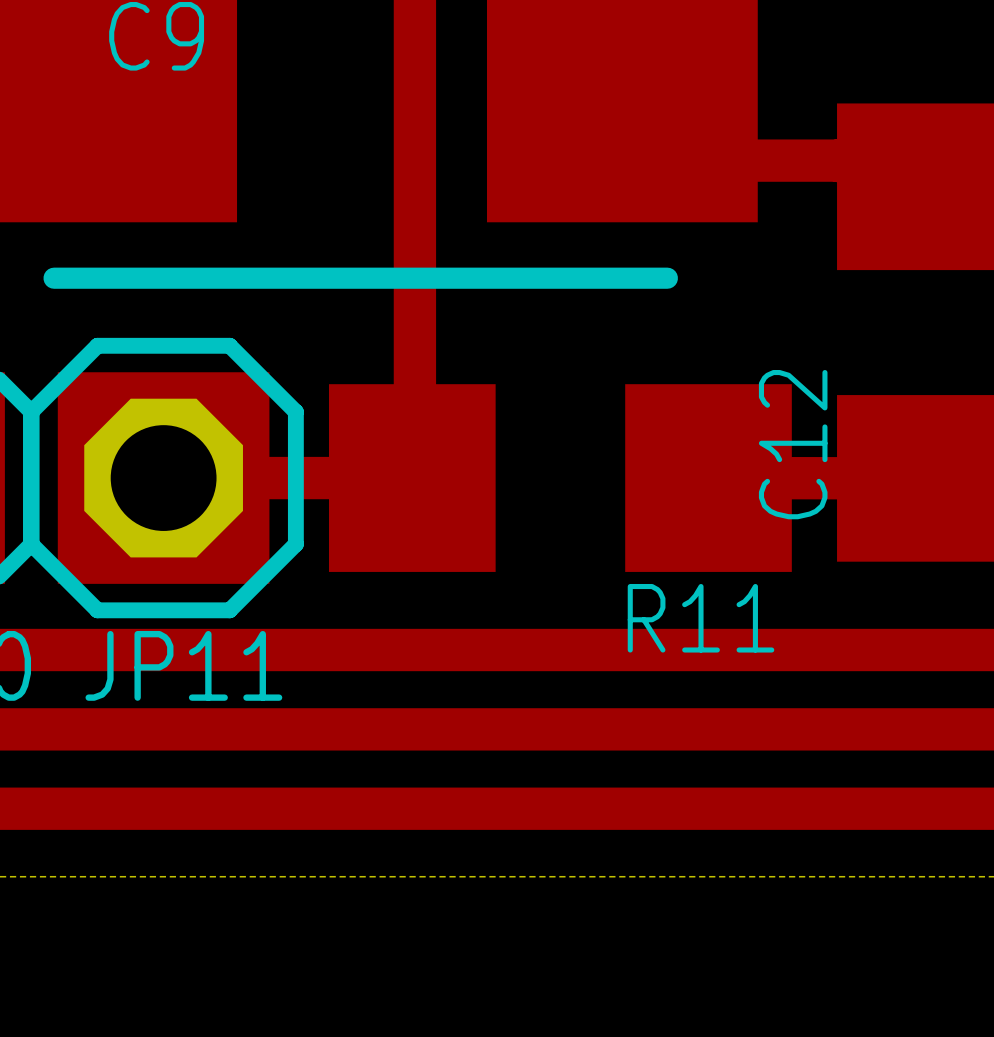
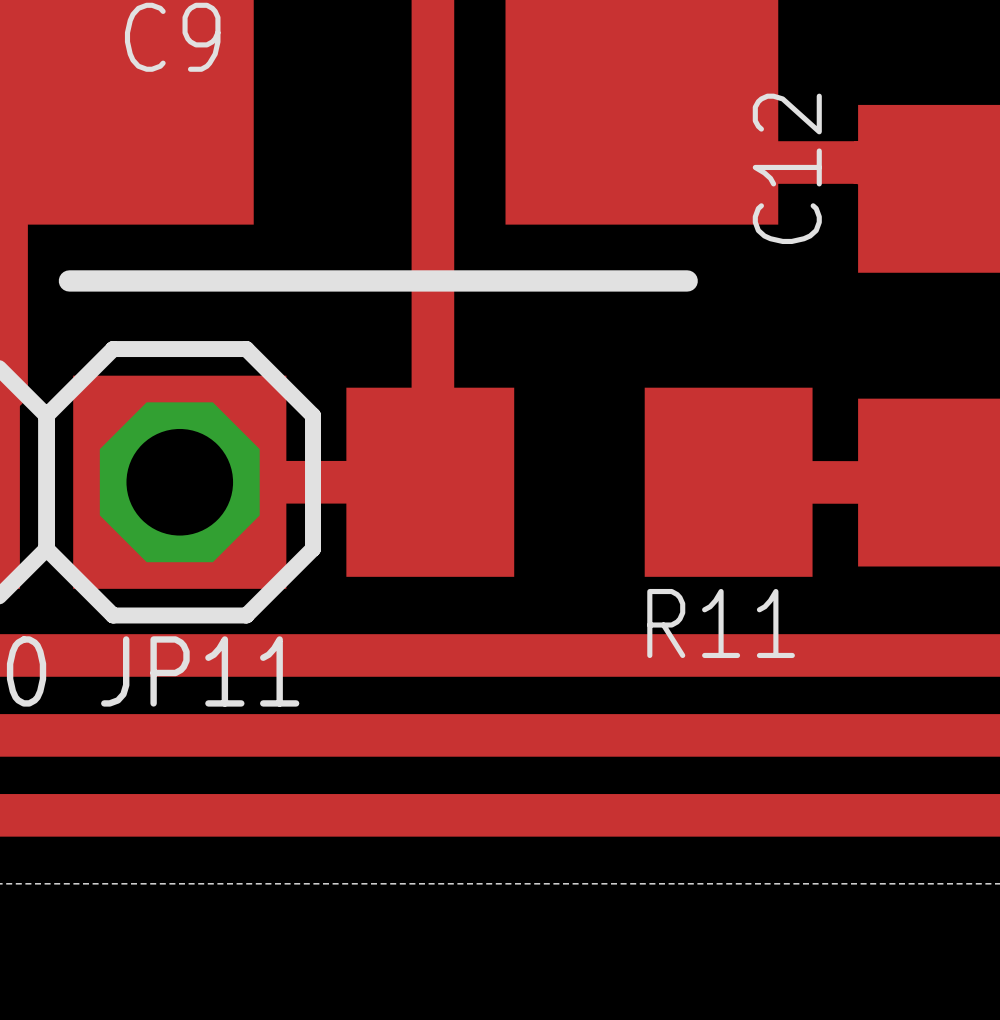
C12 name position: C12 (793, 444) -> C12 (787, 168)

